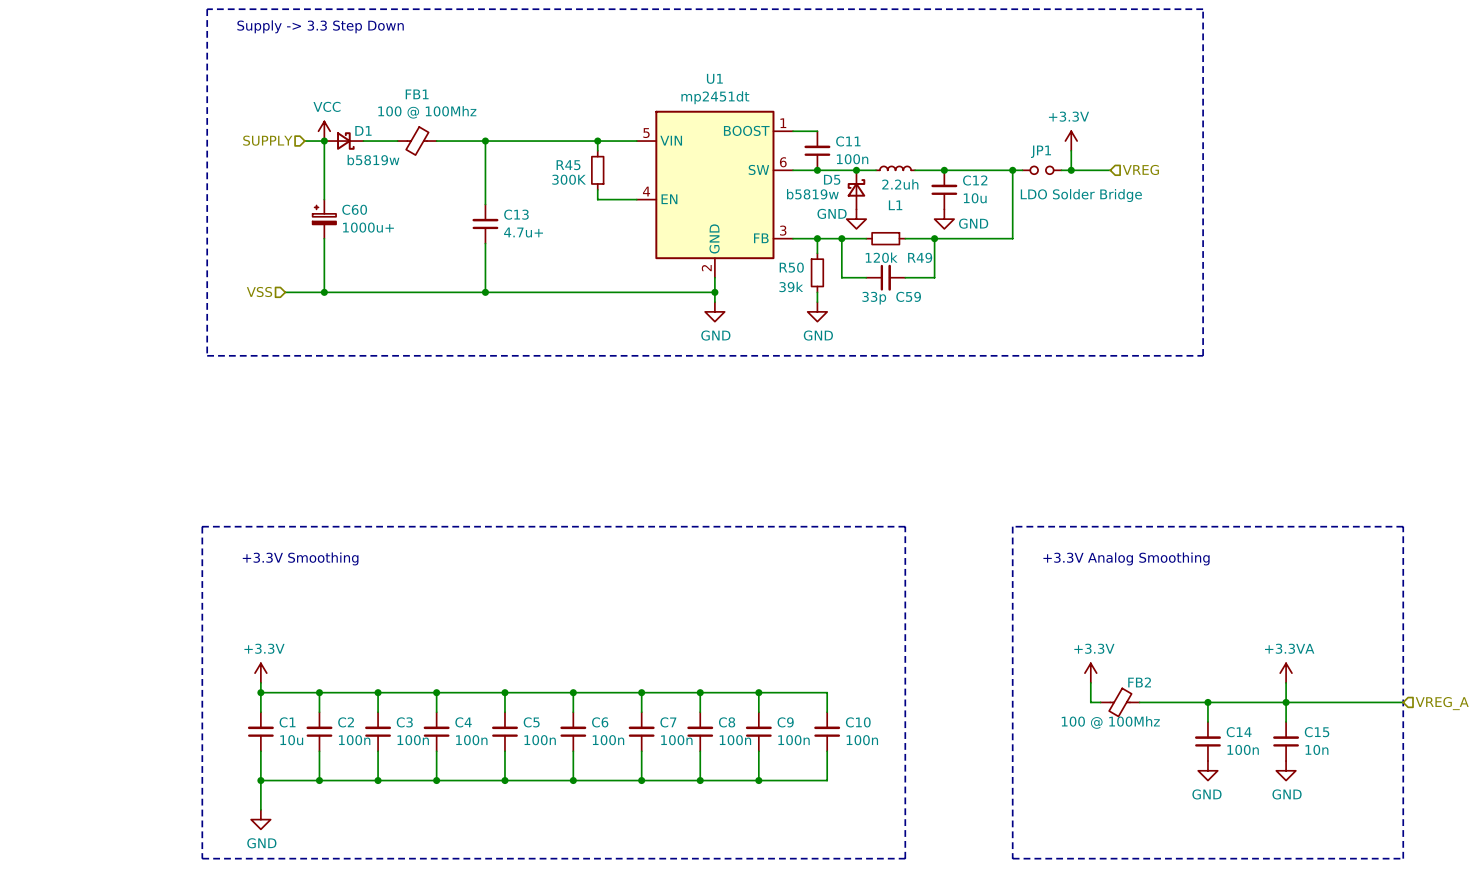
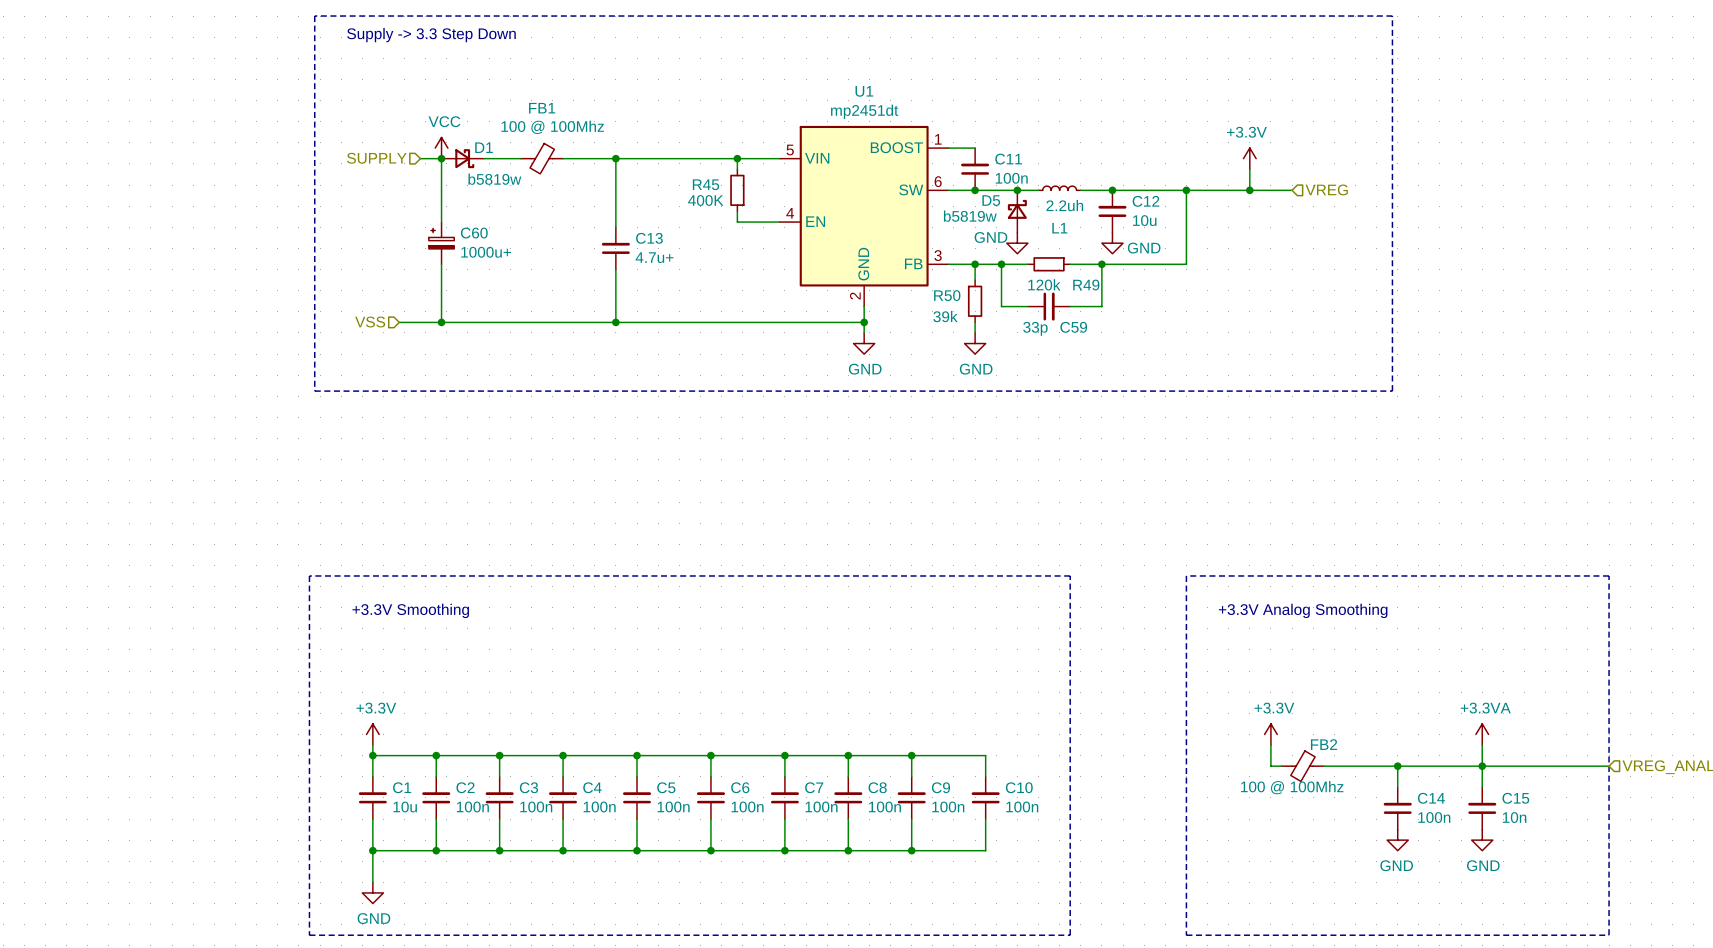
JP1: LDO Solder Bridge (1041, 170) -> none
R45 value: 300K (569, 179) -> 400K (705, 200)

